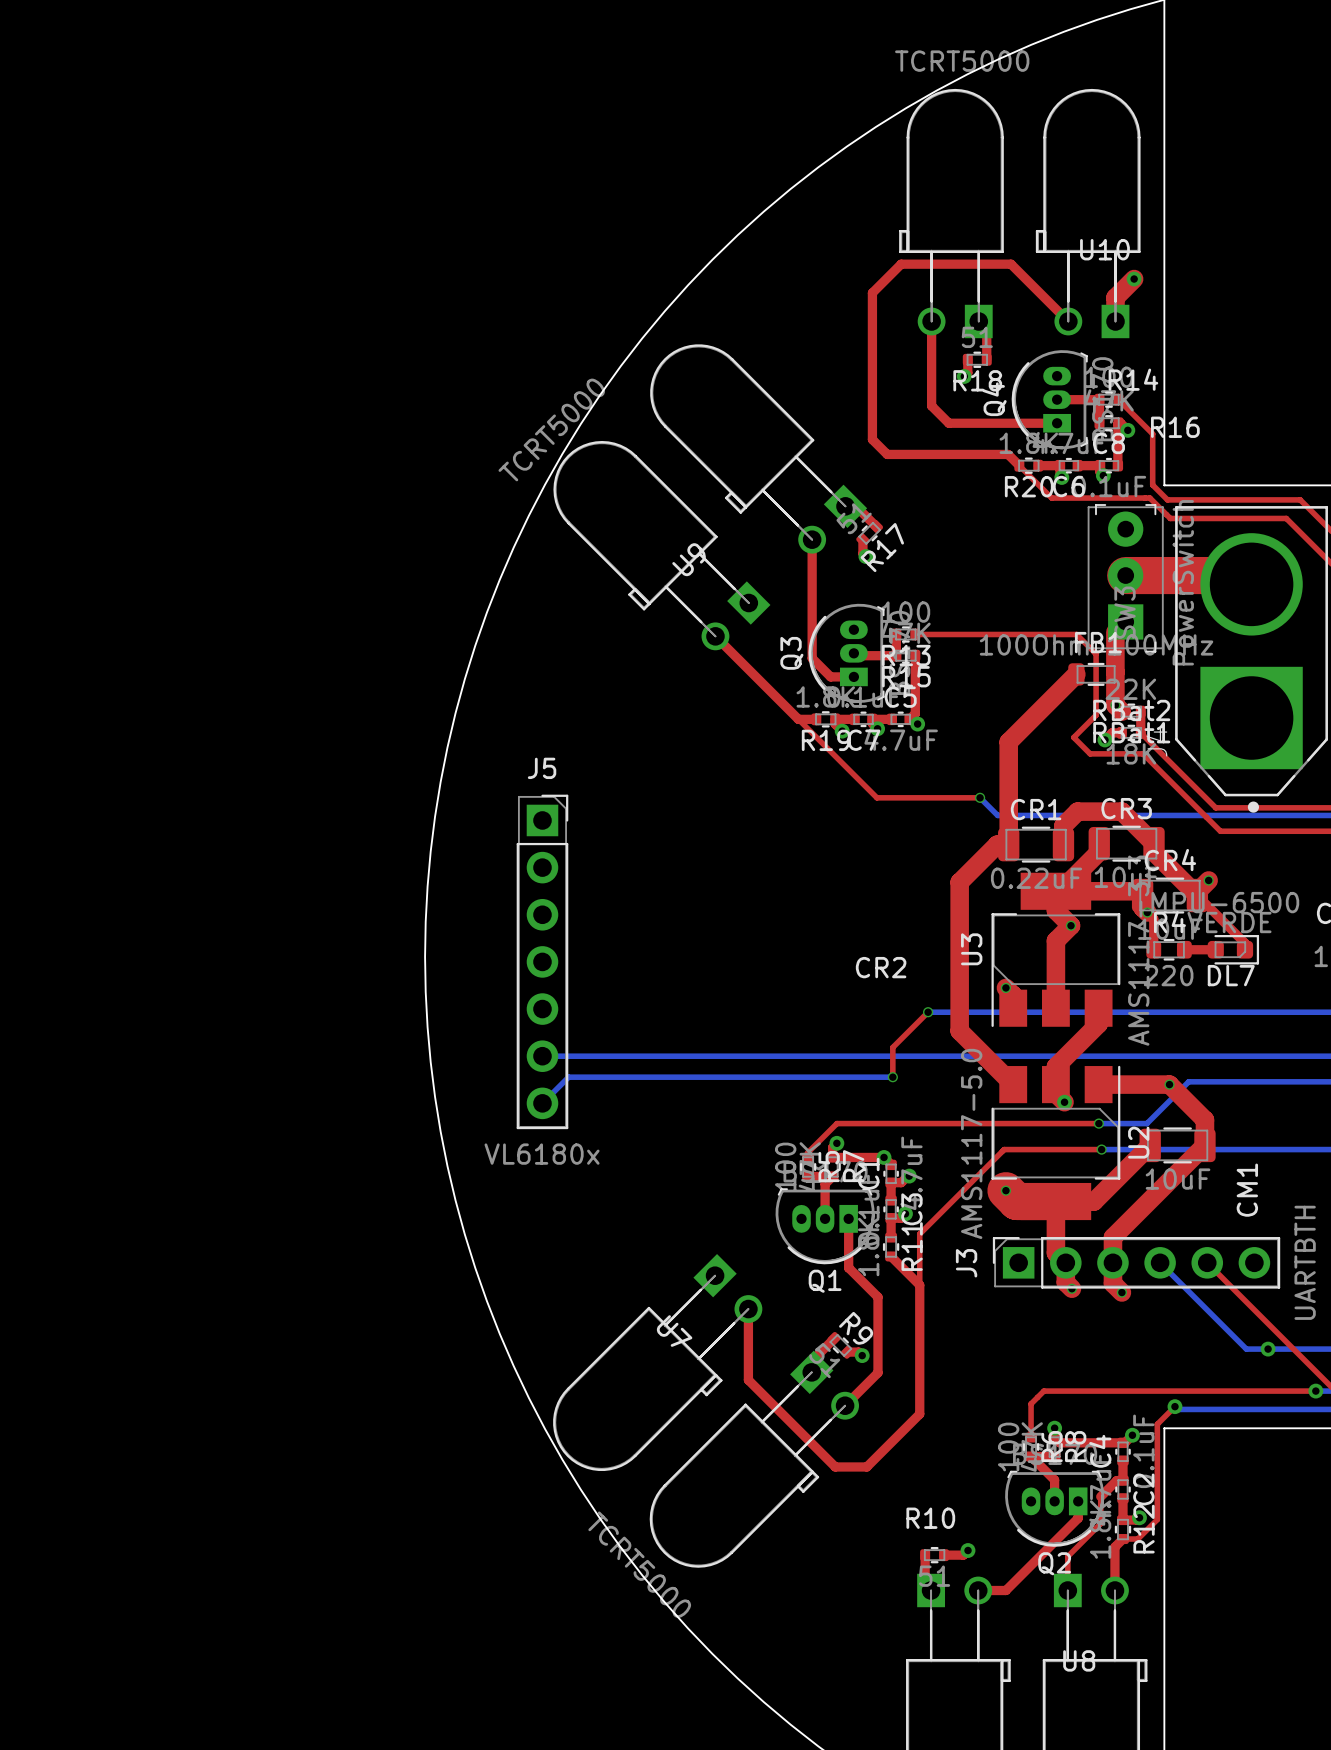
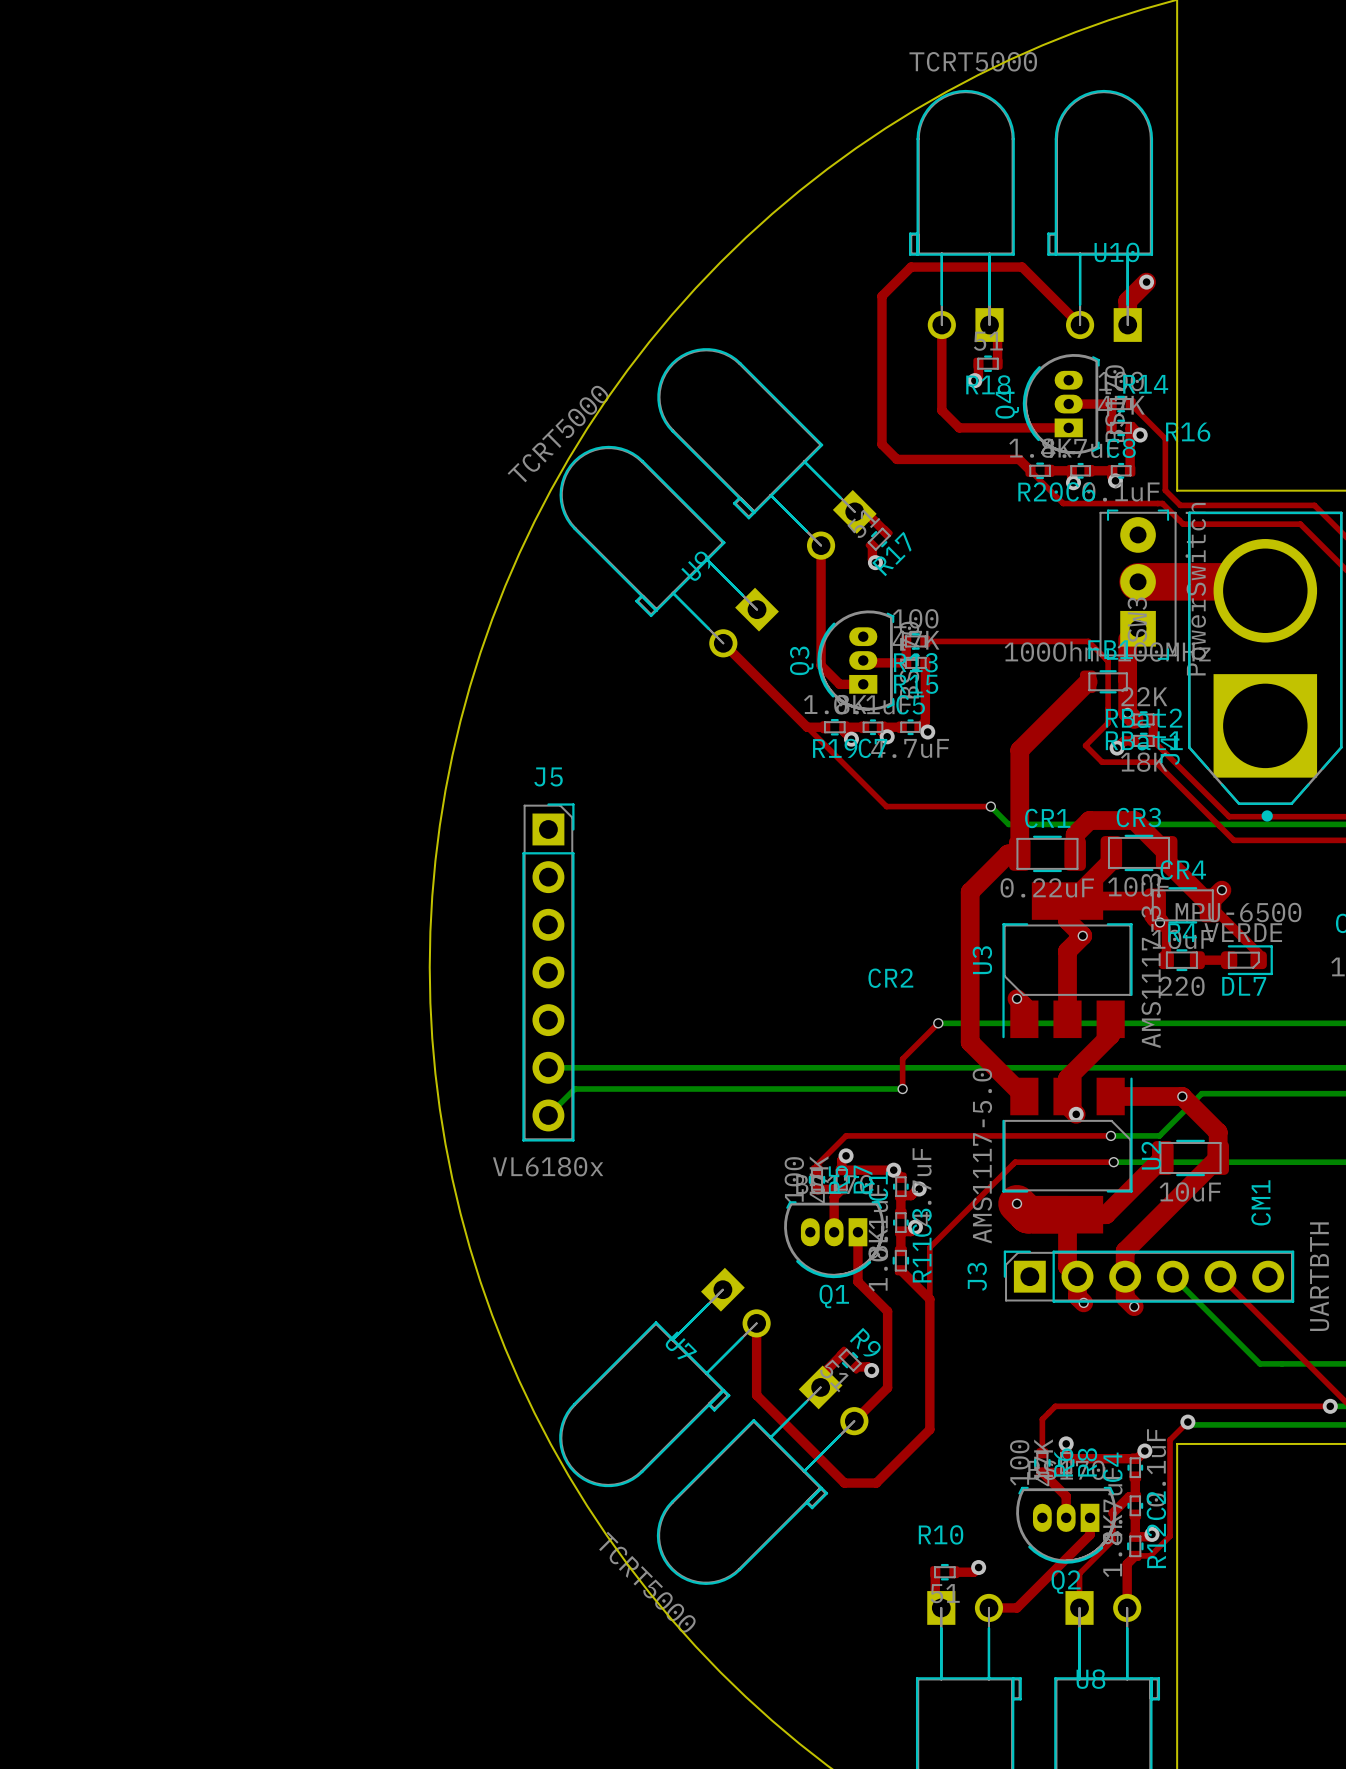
via: (1268, 1349) -> none

